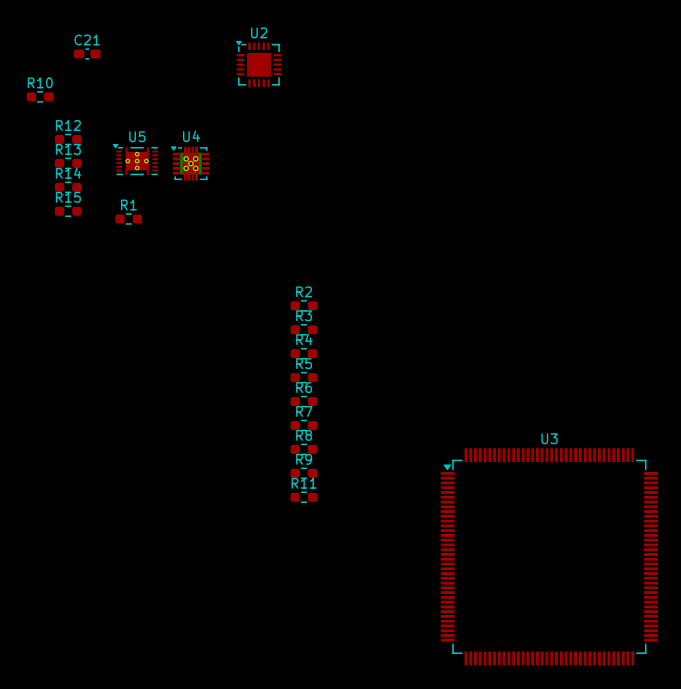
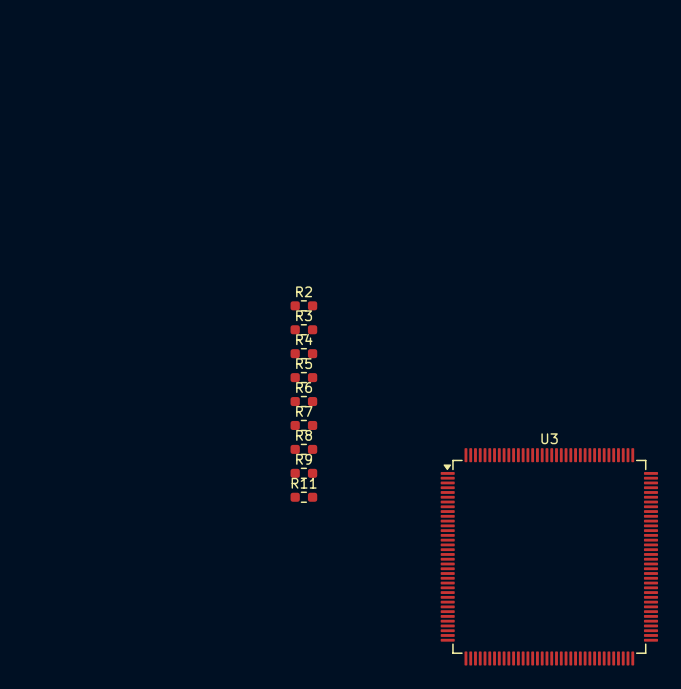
C21: (87, 53) -> none
U2: (258, 63) -> none
R10: (40, 96) -> none
R12: (68, 139) -> none
U5: (135, 159) -> none
R13: (68, 163) -> none
U4: (189, 163) -> none
R14: (68, 187) -> none
R15: (68, 211) -> none
R1: (128, 218) -> none

